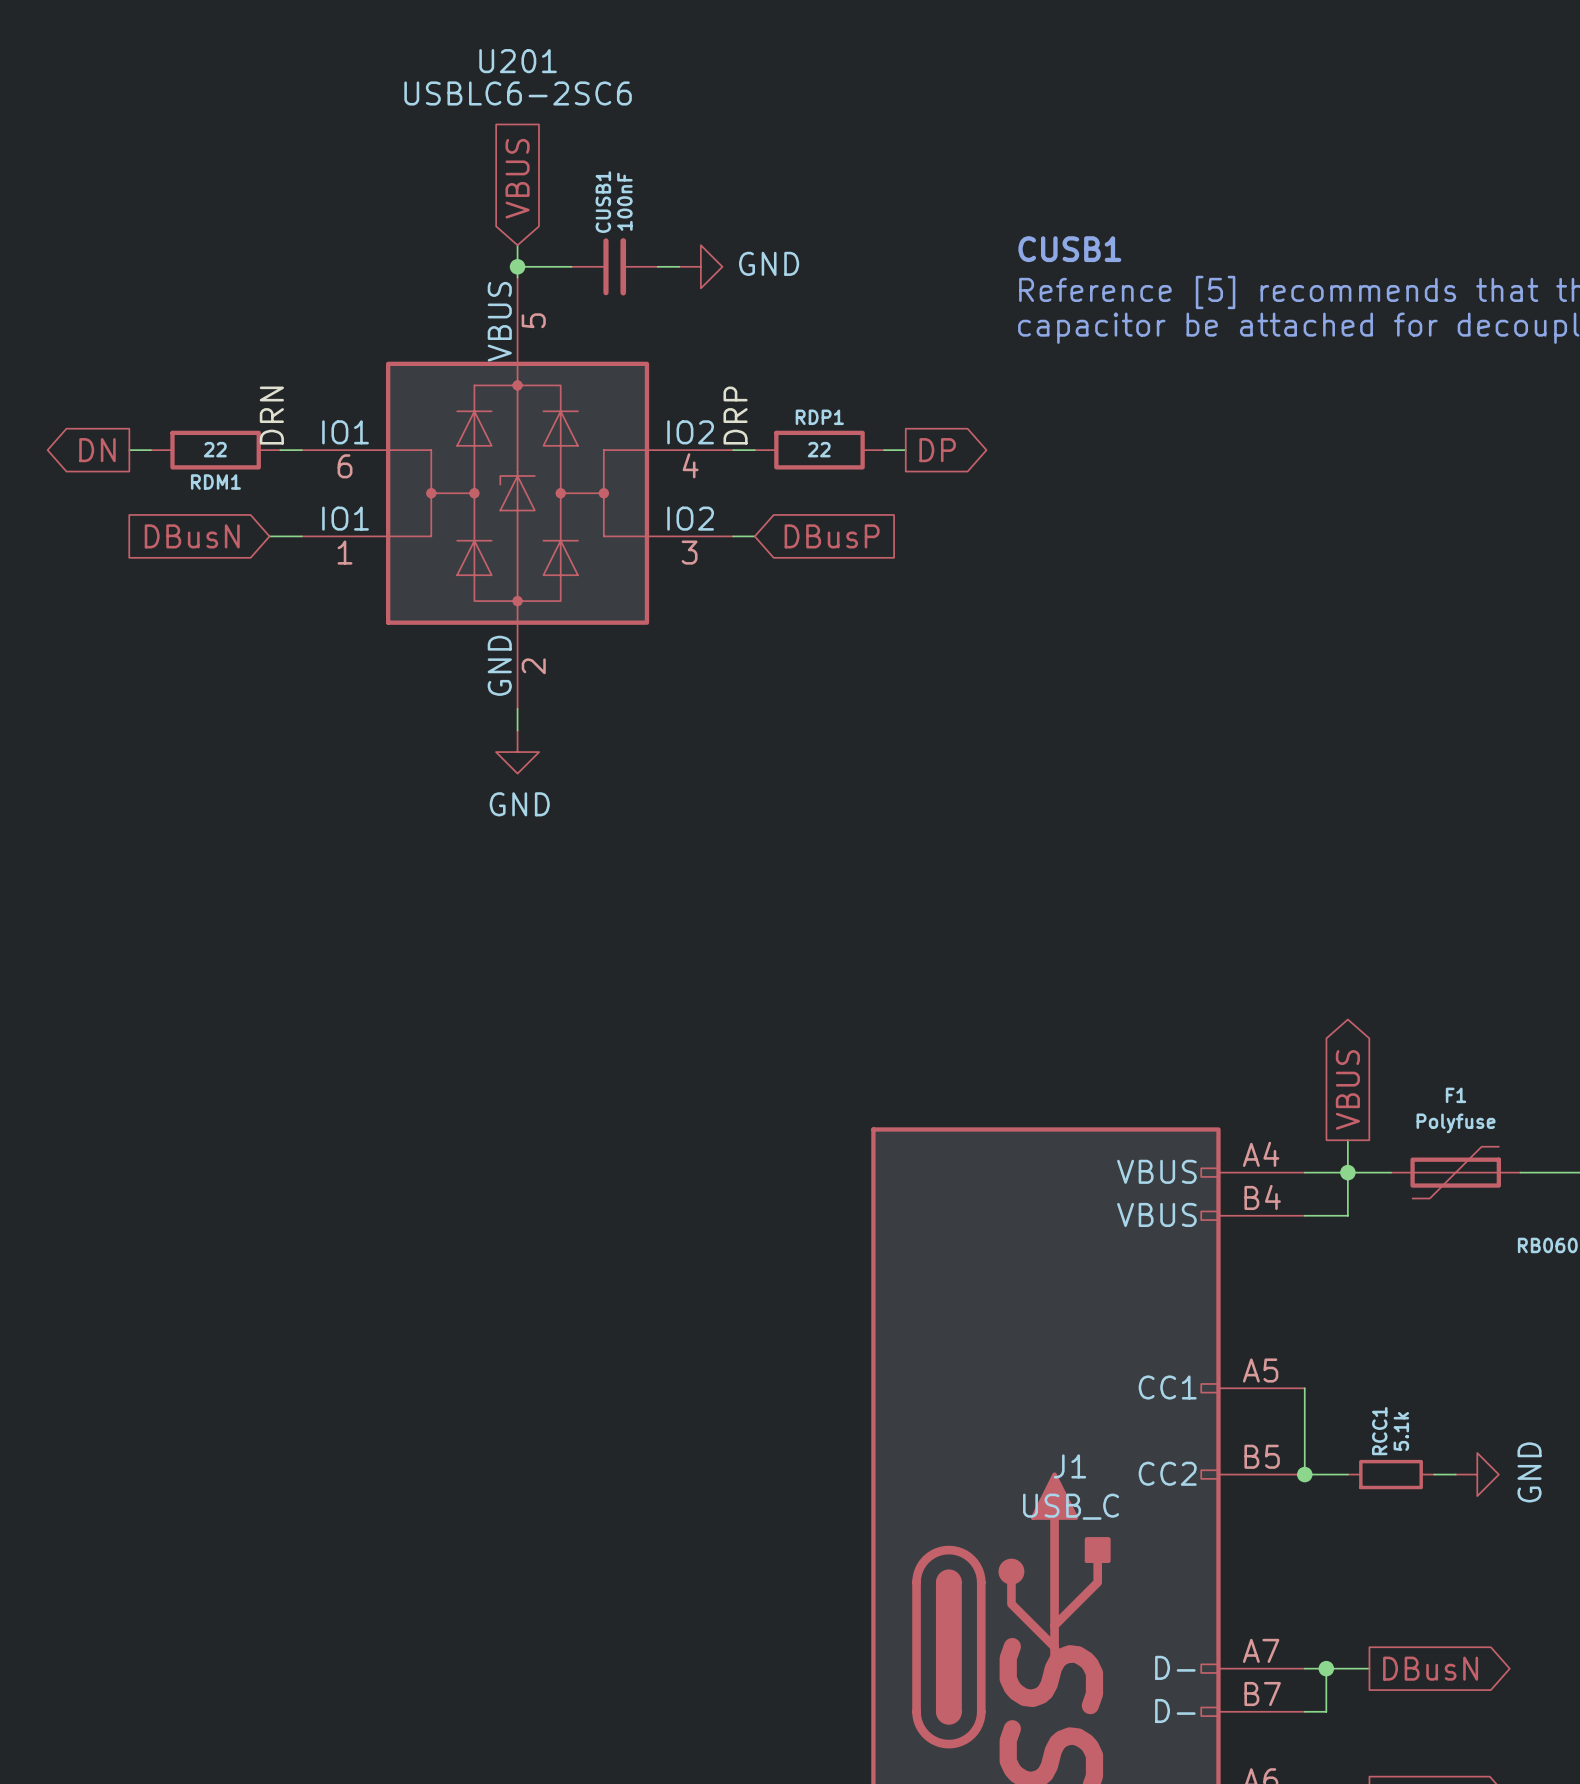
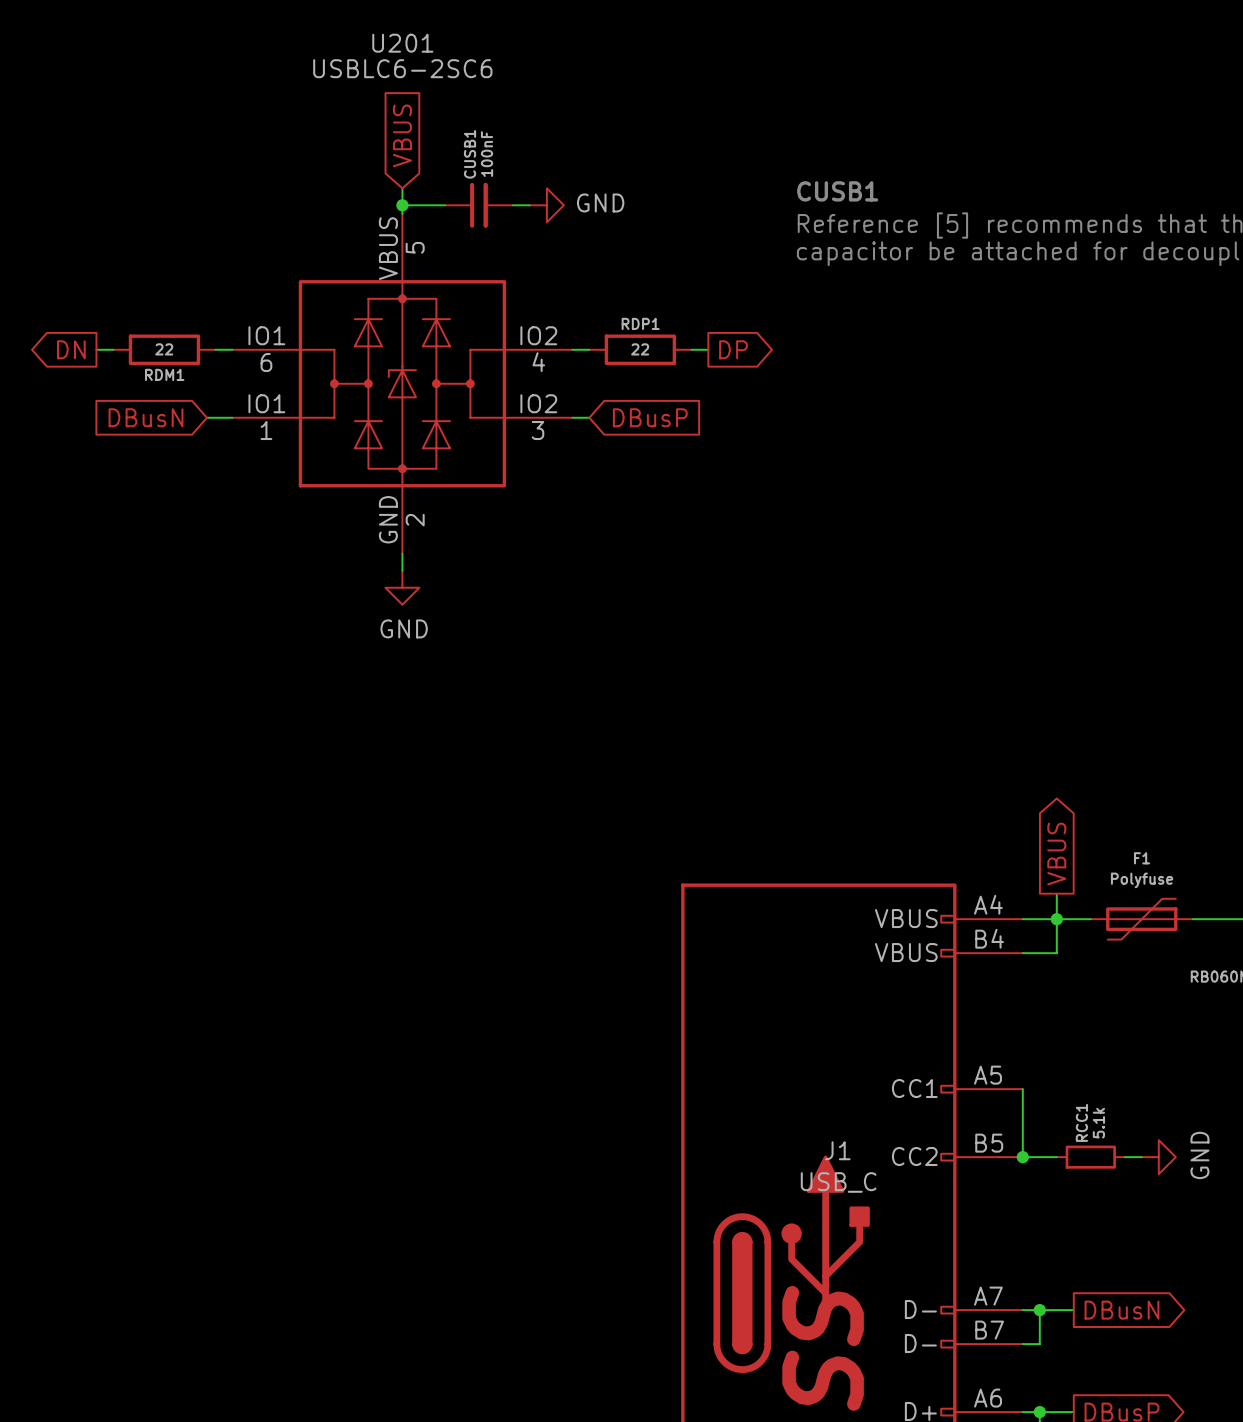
label: DRN (271, 415) -> none
label: DRP (735, 415) -> none

